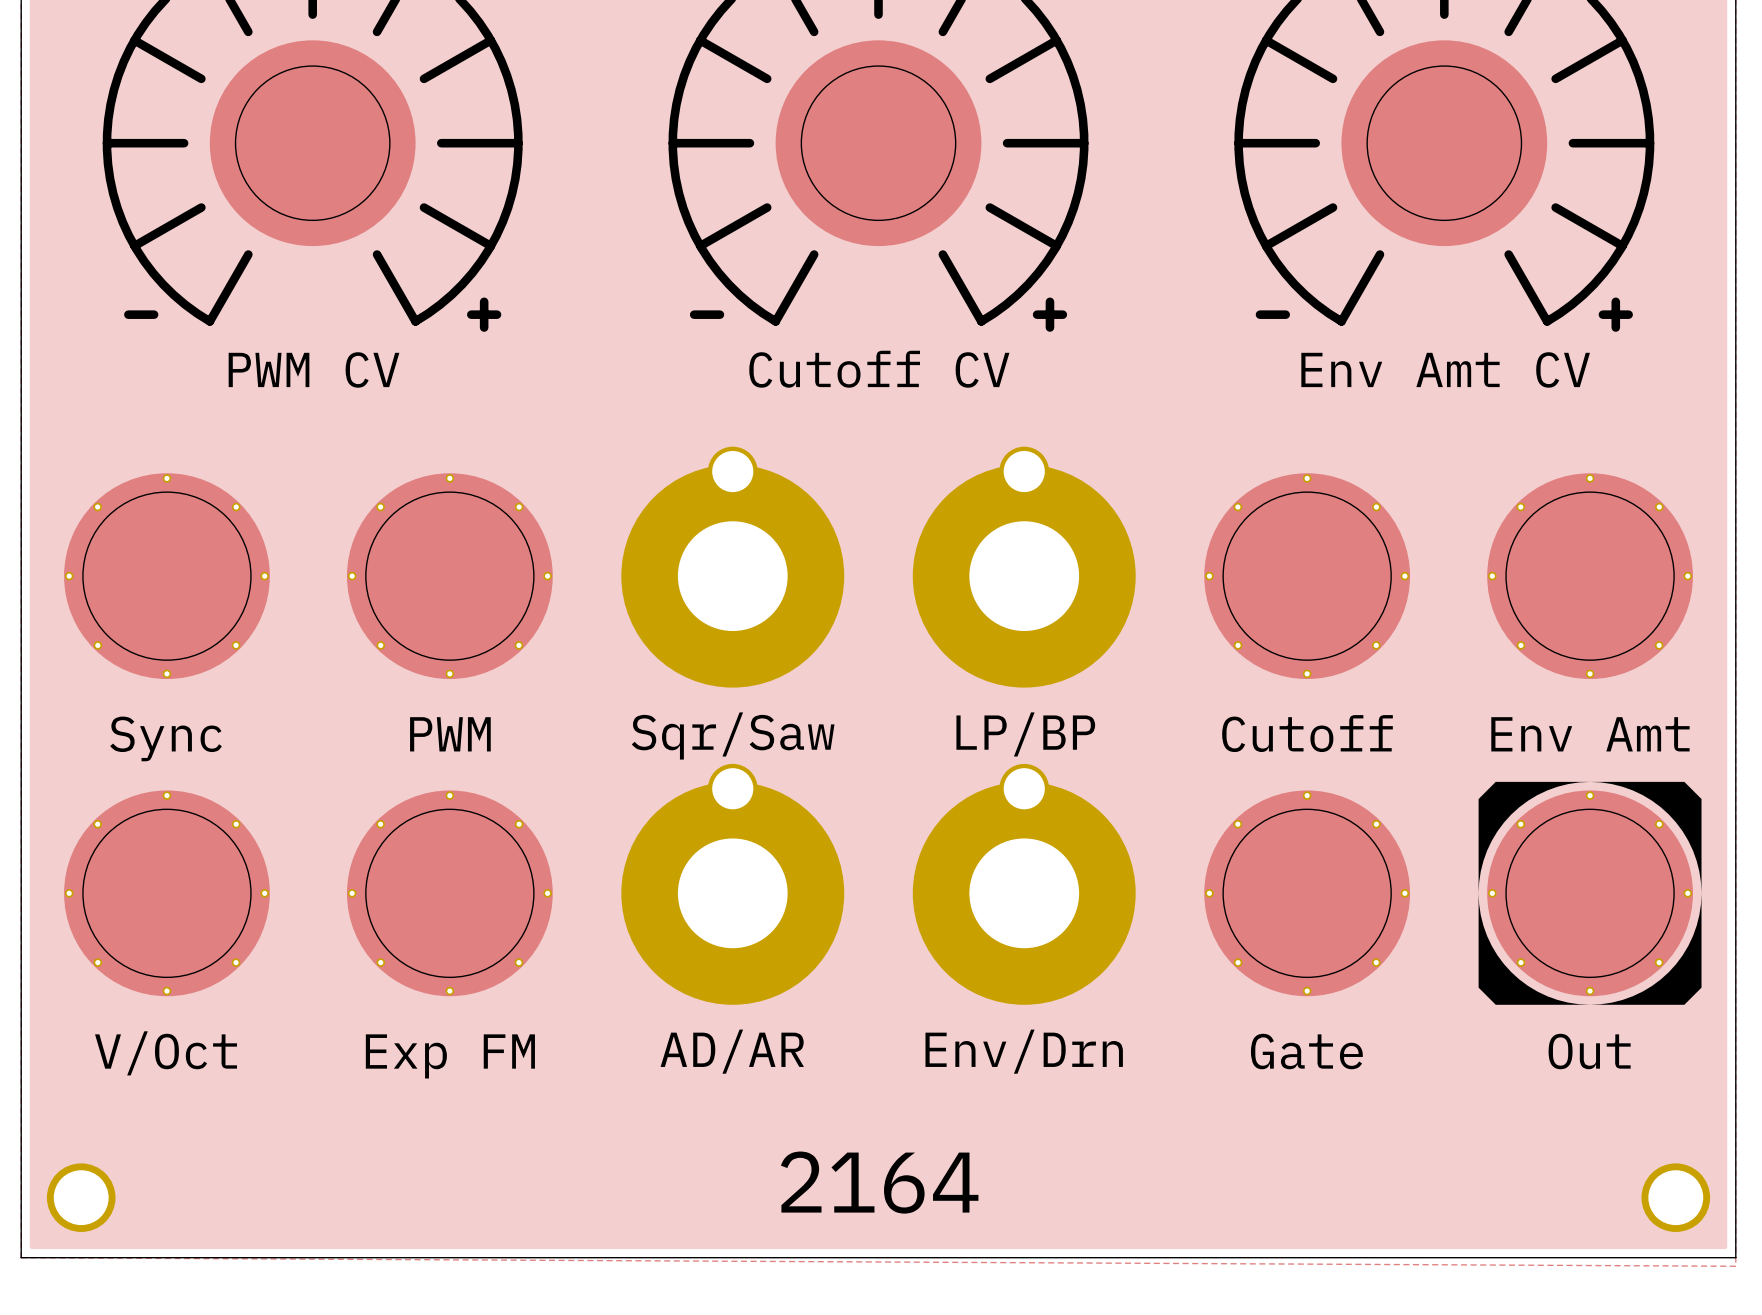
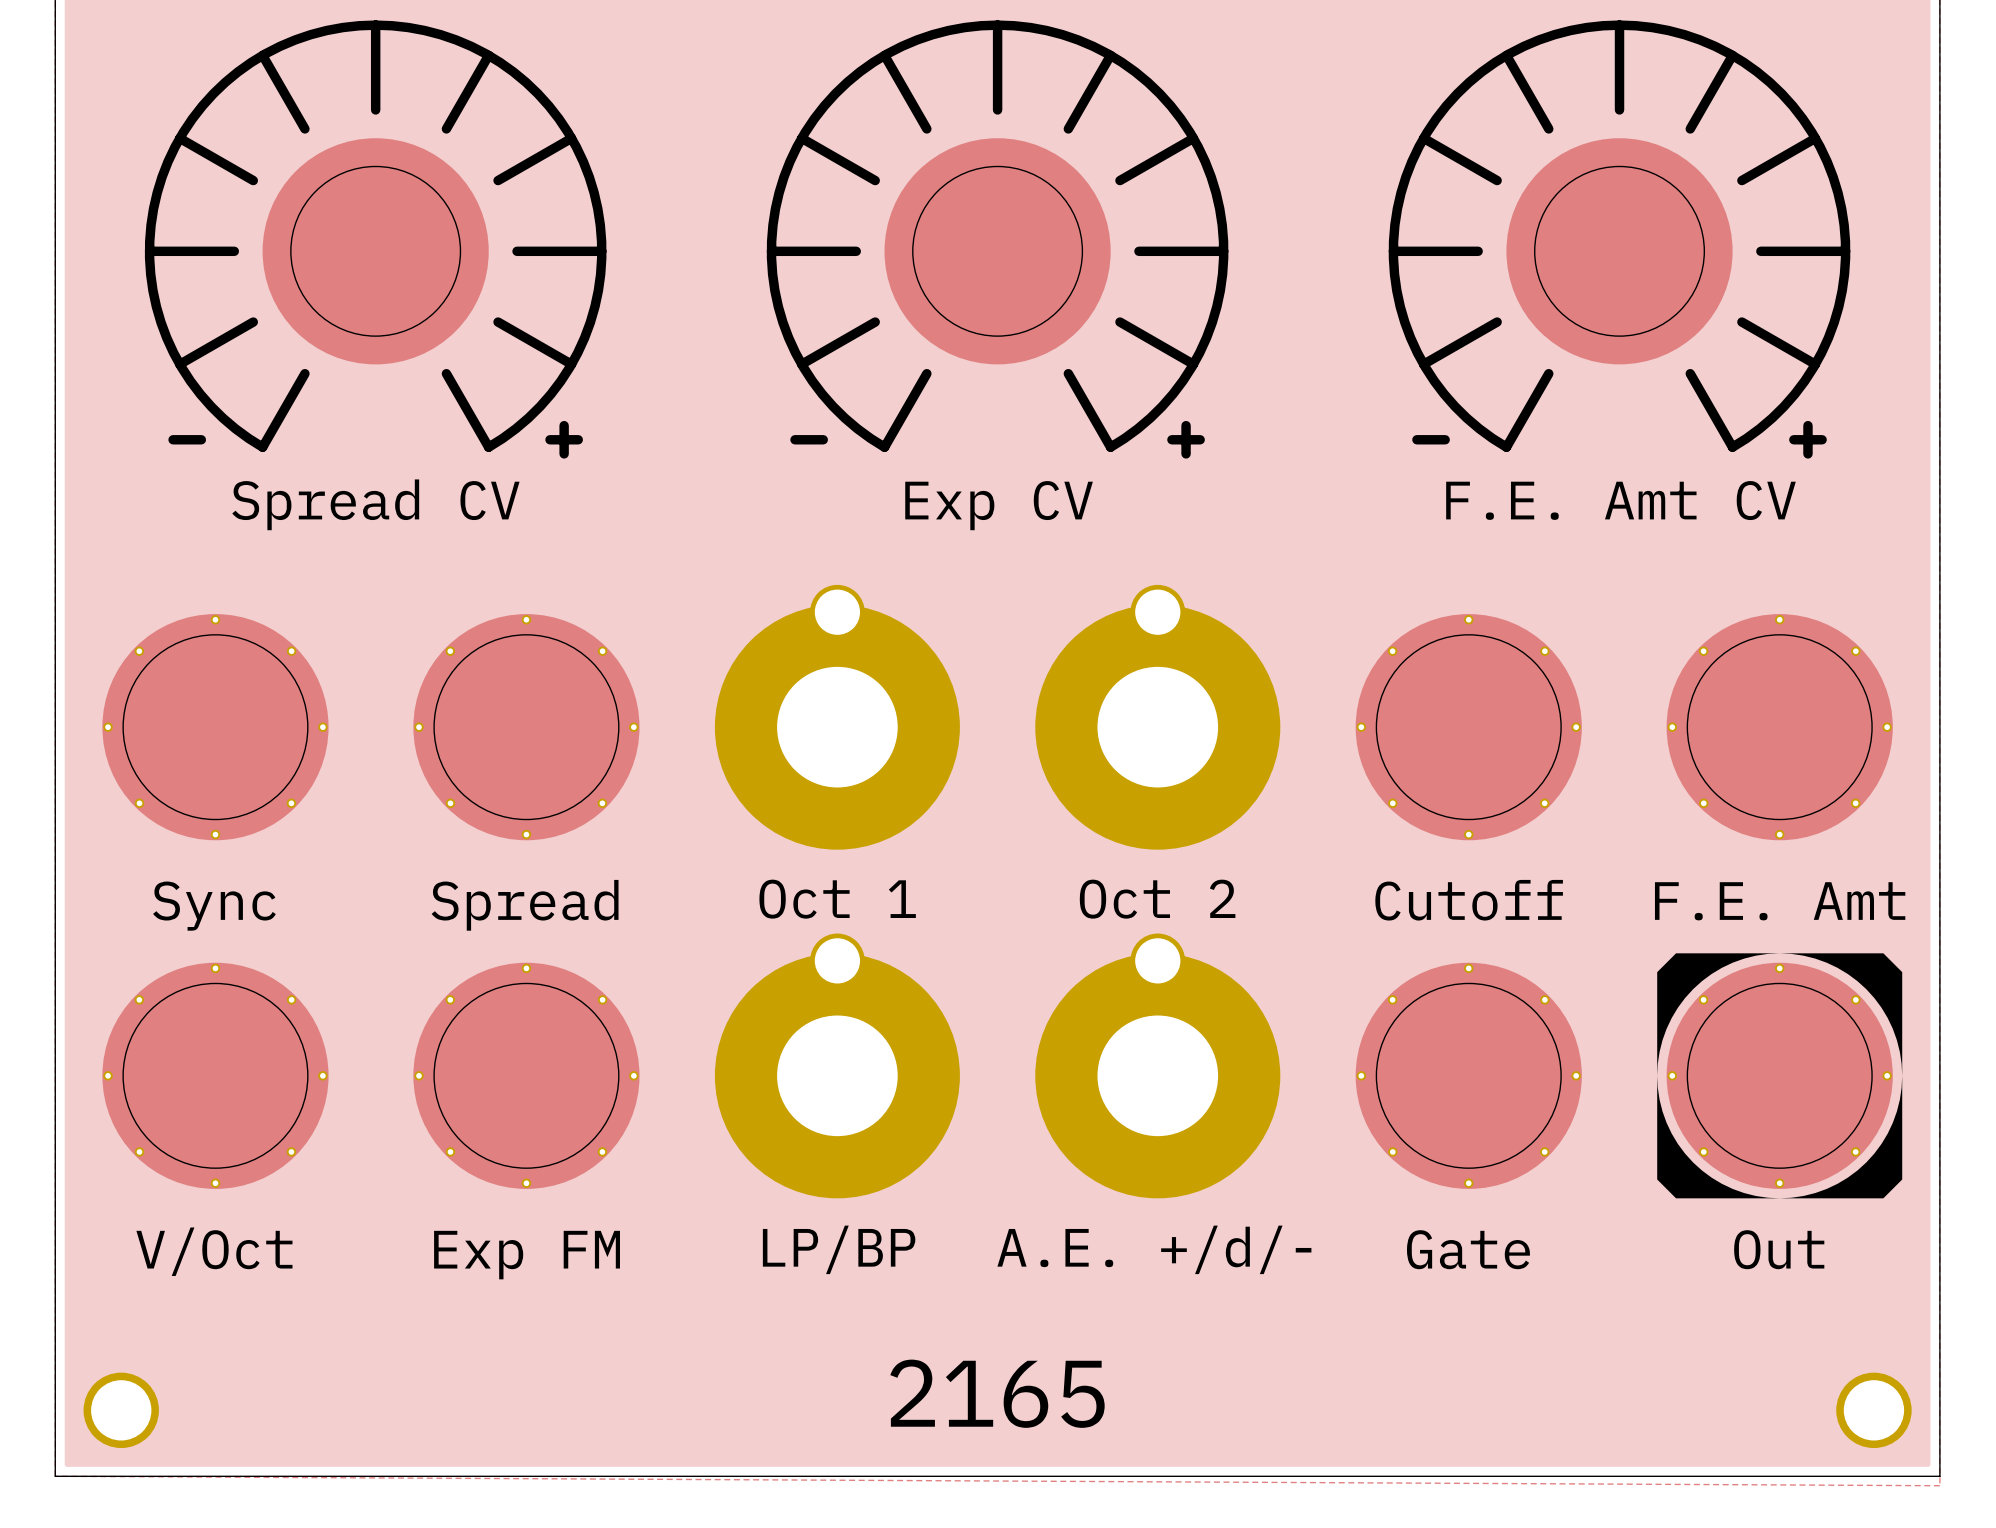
part value: PWM CV (314, 369) -> Spread CV (375, 504)
part value: Cutoff CV (879, 369) -> Exp CV (999, 505)
part value: Env Amt CV (1445, 369) -> F.E. Amt CV (1620, 500)
part value: PWM (450, 734) -> Spread (525, 905)
part value: LP/BP (1025, 734) -> Oct 2 (1157, 899)
part value: Env Amt (1590, 734) -> F.E. Amt (1780, 901)
part value: Sqr/Saw (733, 735) -> Oct 1 (837, 899)
part value: AD/AR (732, 1051) -> LP/BP (839, 1249)
part value: Env/Drn (1024, 1051) -> A.E. +/d/- (1154, 1249)
text: 2164 (879, 1182) -> 2165 (997, 1393)

